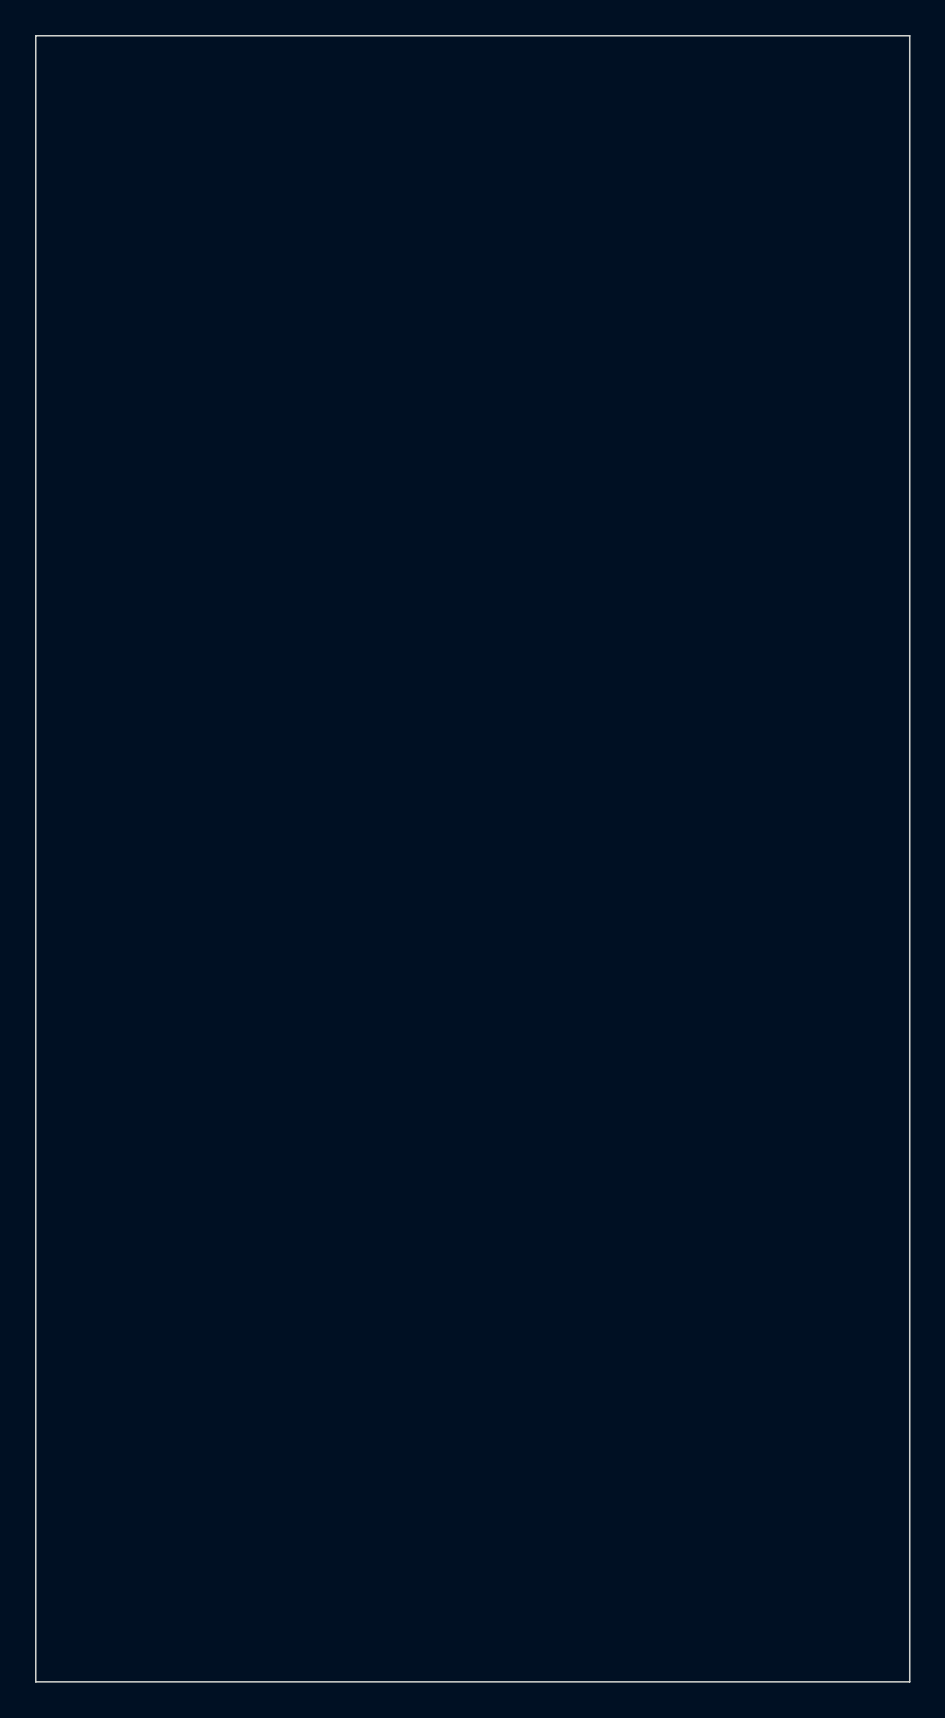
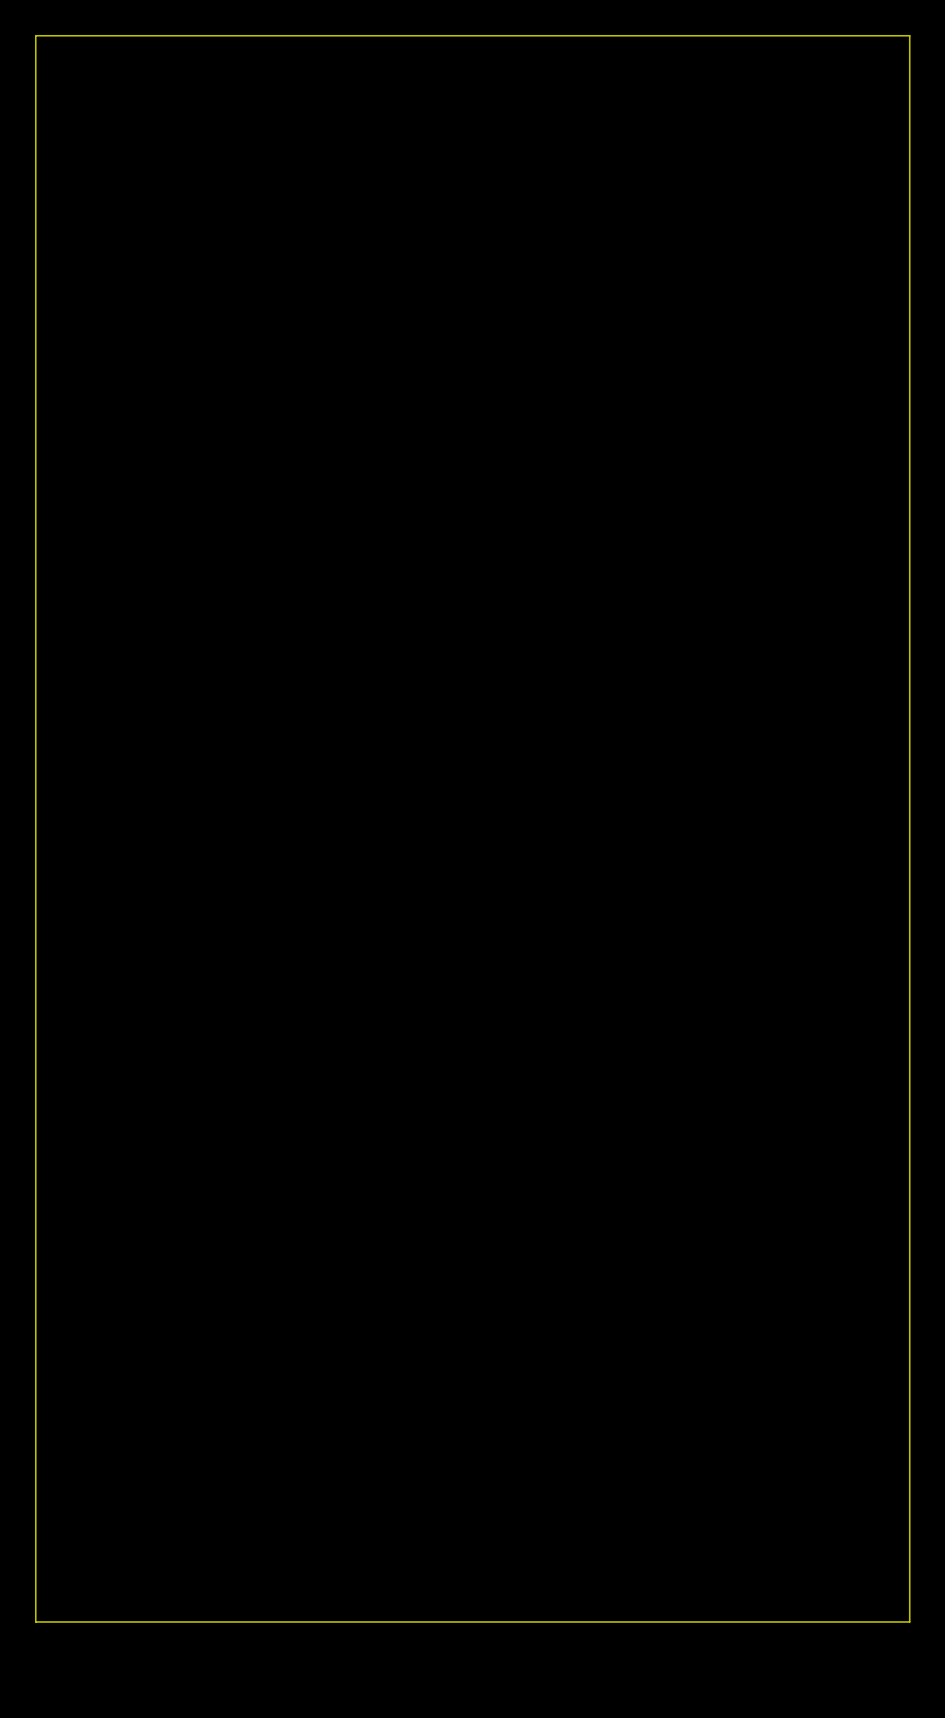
board edge: (35, 1621) (35, 1681) (909, 1681) (909, 1621) -> (35, 1621) (909, 1621)

